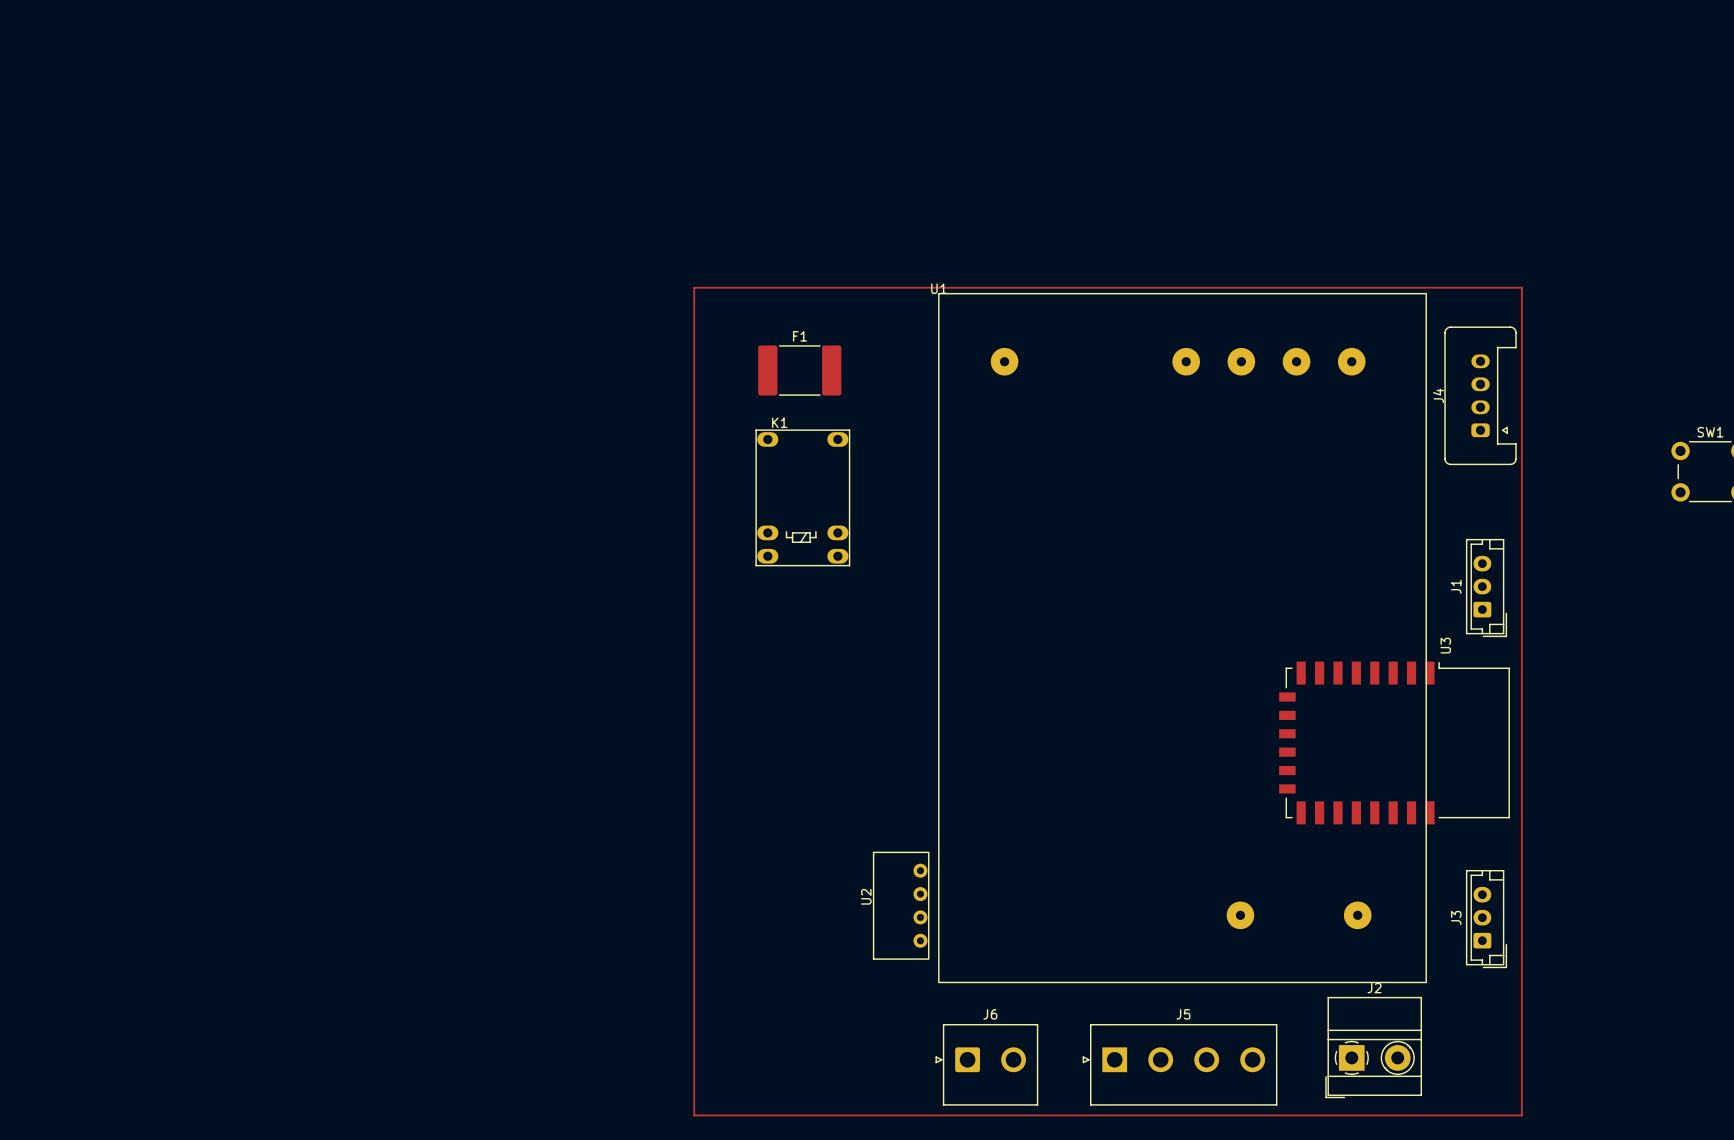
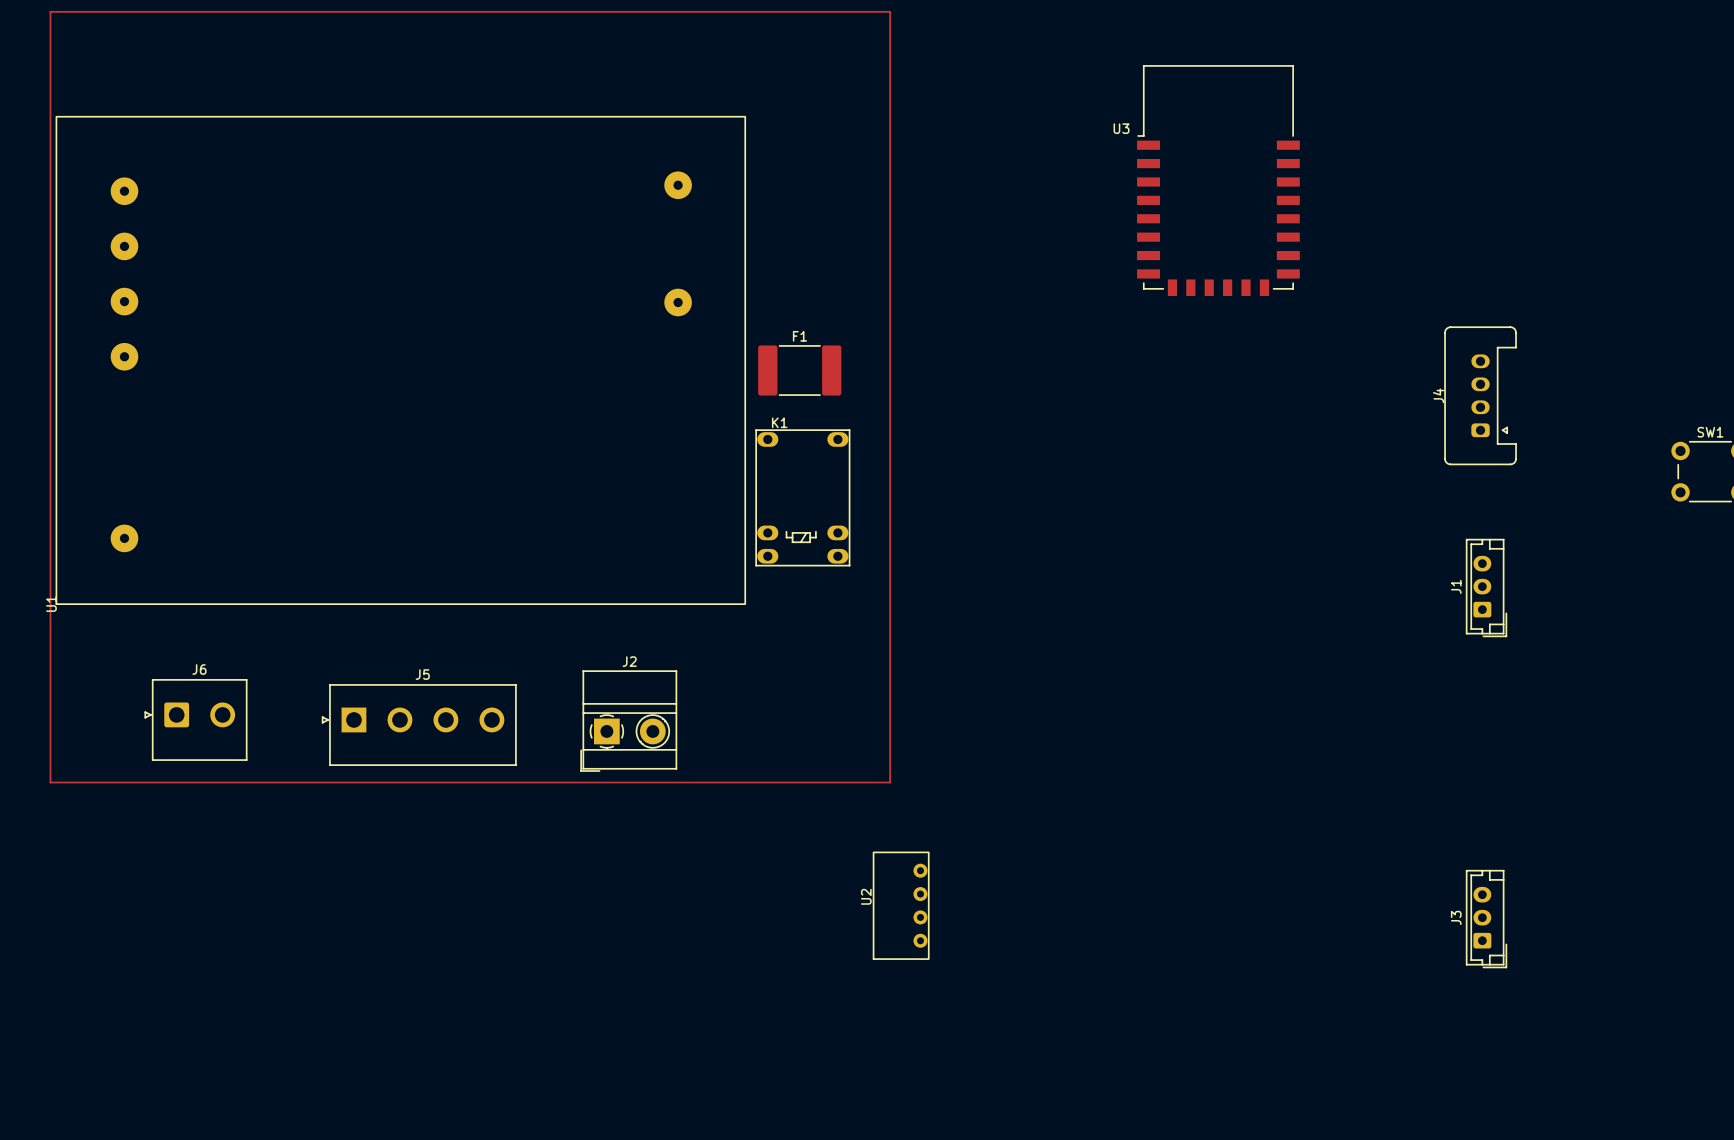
track: none -> (50, 11) (890, 11) (890, 782) (50, 782) (50, 11)
track: (694, 287) (1521, 287) (1521, 1115) (694, 1115) (694, 287) -> none
U1 rotation: 0° (1182, 638) -> 90° counterclockwise (400, 360)
U1 position: (1182, 638) -> (400, 360)
U3 rotation: 0° (1394, 742) -> 90° counterclockwise (1218, 180)
U3 position: (1394, 742) -> (1218, 180)
J2 position: (1373, 1047) -> (628, 721)
J6 position: (986, 1064) -> (196, 719)
J5 position: (1180, 1064) -> (419, 725)

